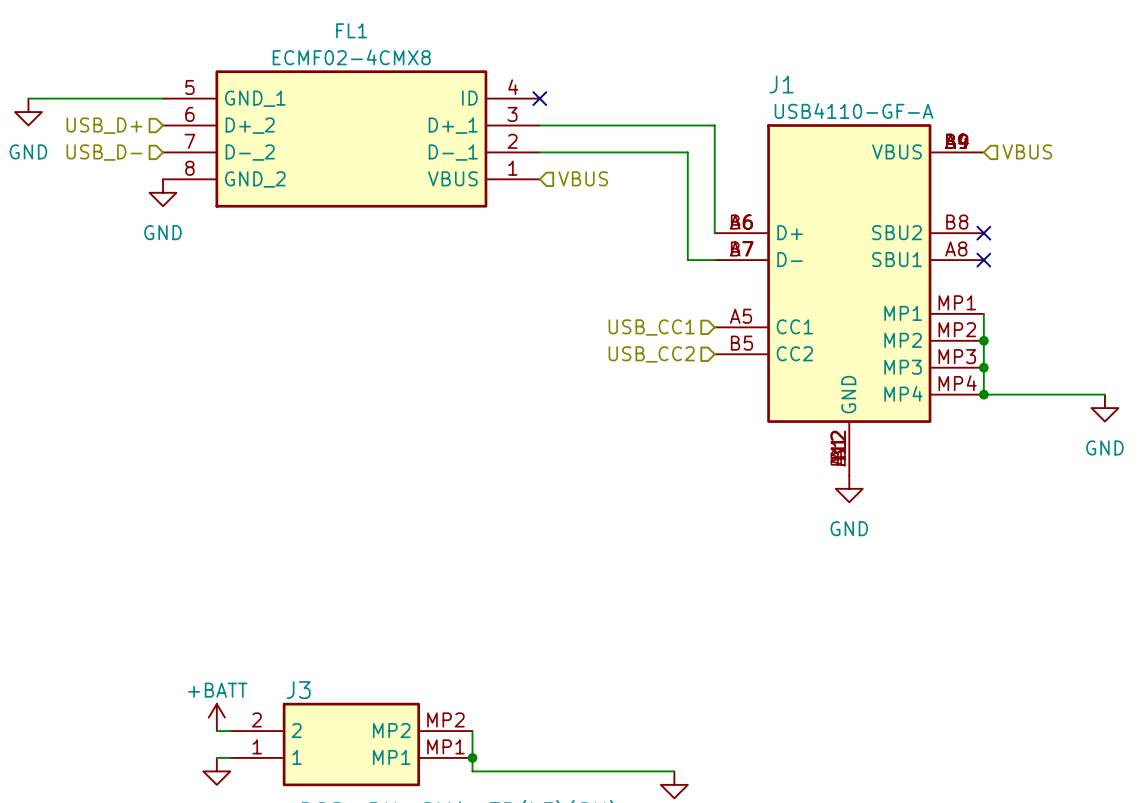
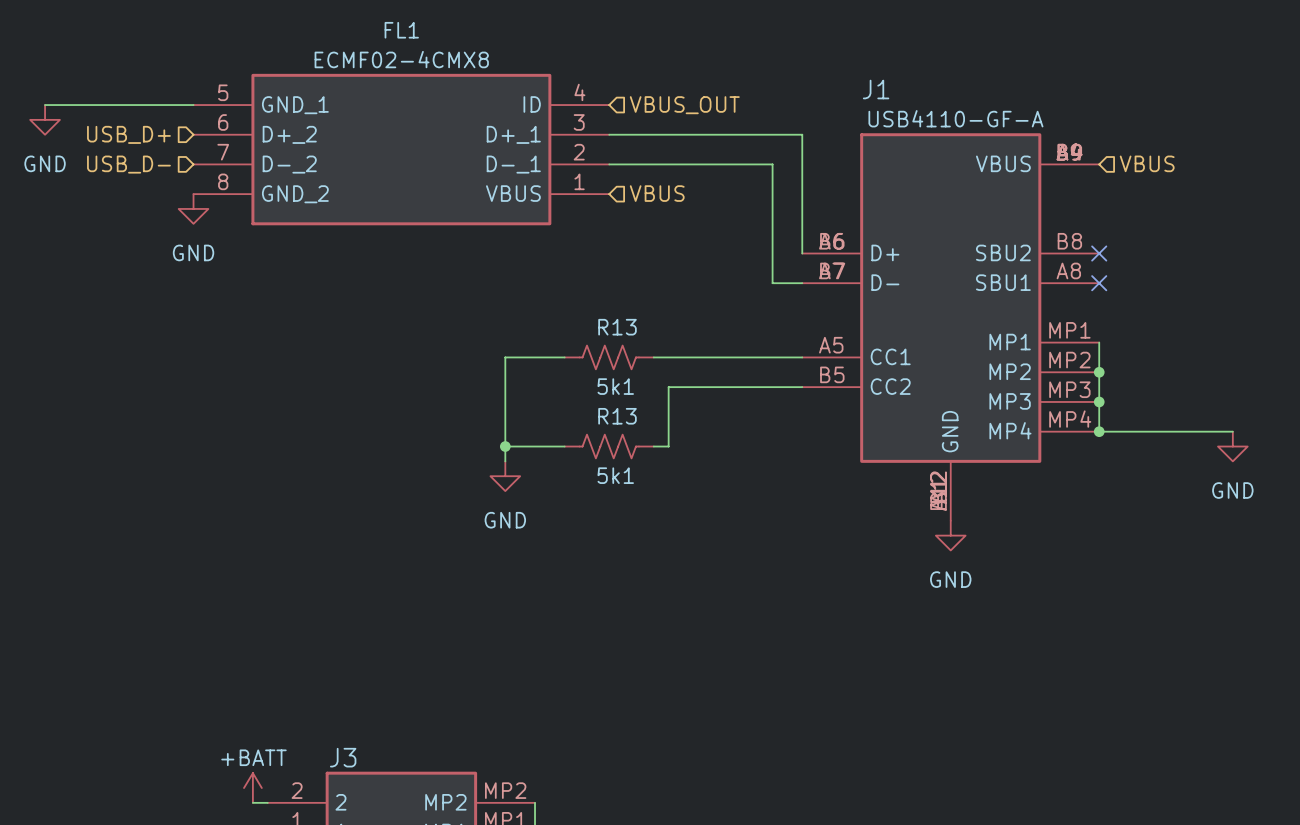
no-connect mark: (539, 98) -> none
hierarchical label: none -> VBUS_OUT (684, 105)
wire: none -> (564, 357) (505, 357) (505, 461)
R13: none -> 5k1 (609, 357)
wire: none -> (653, 357) (802, 357)
hierarchical label: USB_CC1 (651, 327) -> none
hierarchical label: USB_CC2 (651, 354) -> none
wire: none -> (802, 387) (668, 387) (668, 446) (653, 446)
wire: none -> (505, 446) (564, 446)
junction: none -> (505, 446)
R13: none -> 5k1 (609, 446)
power symbol: none -> GND (505, 476)

